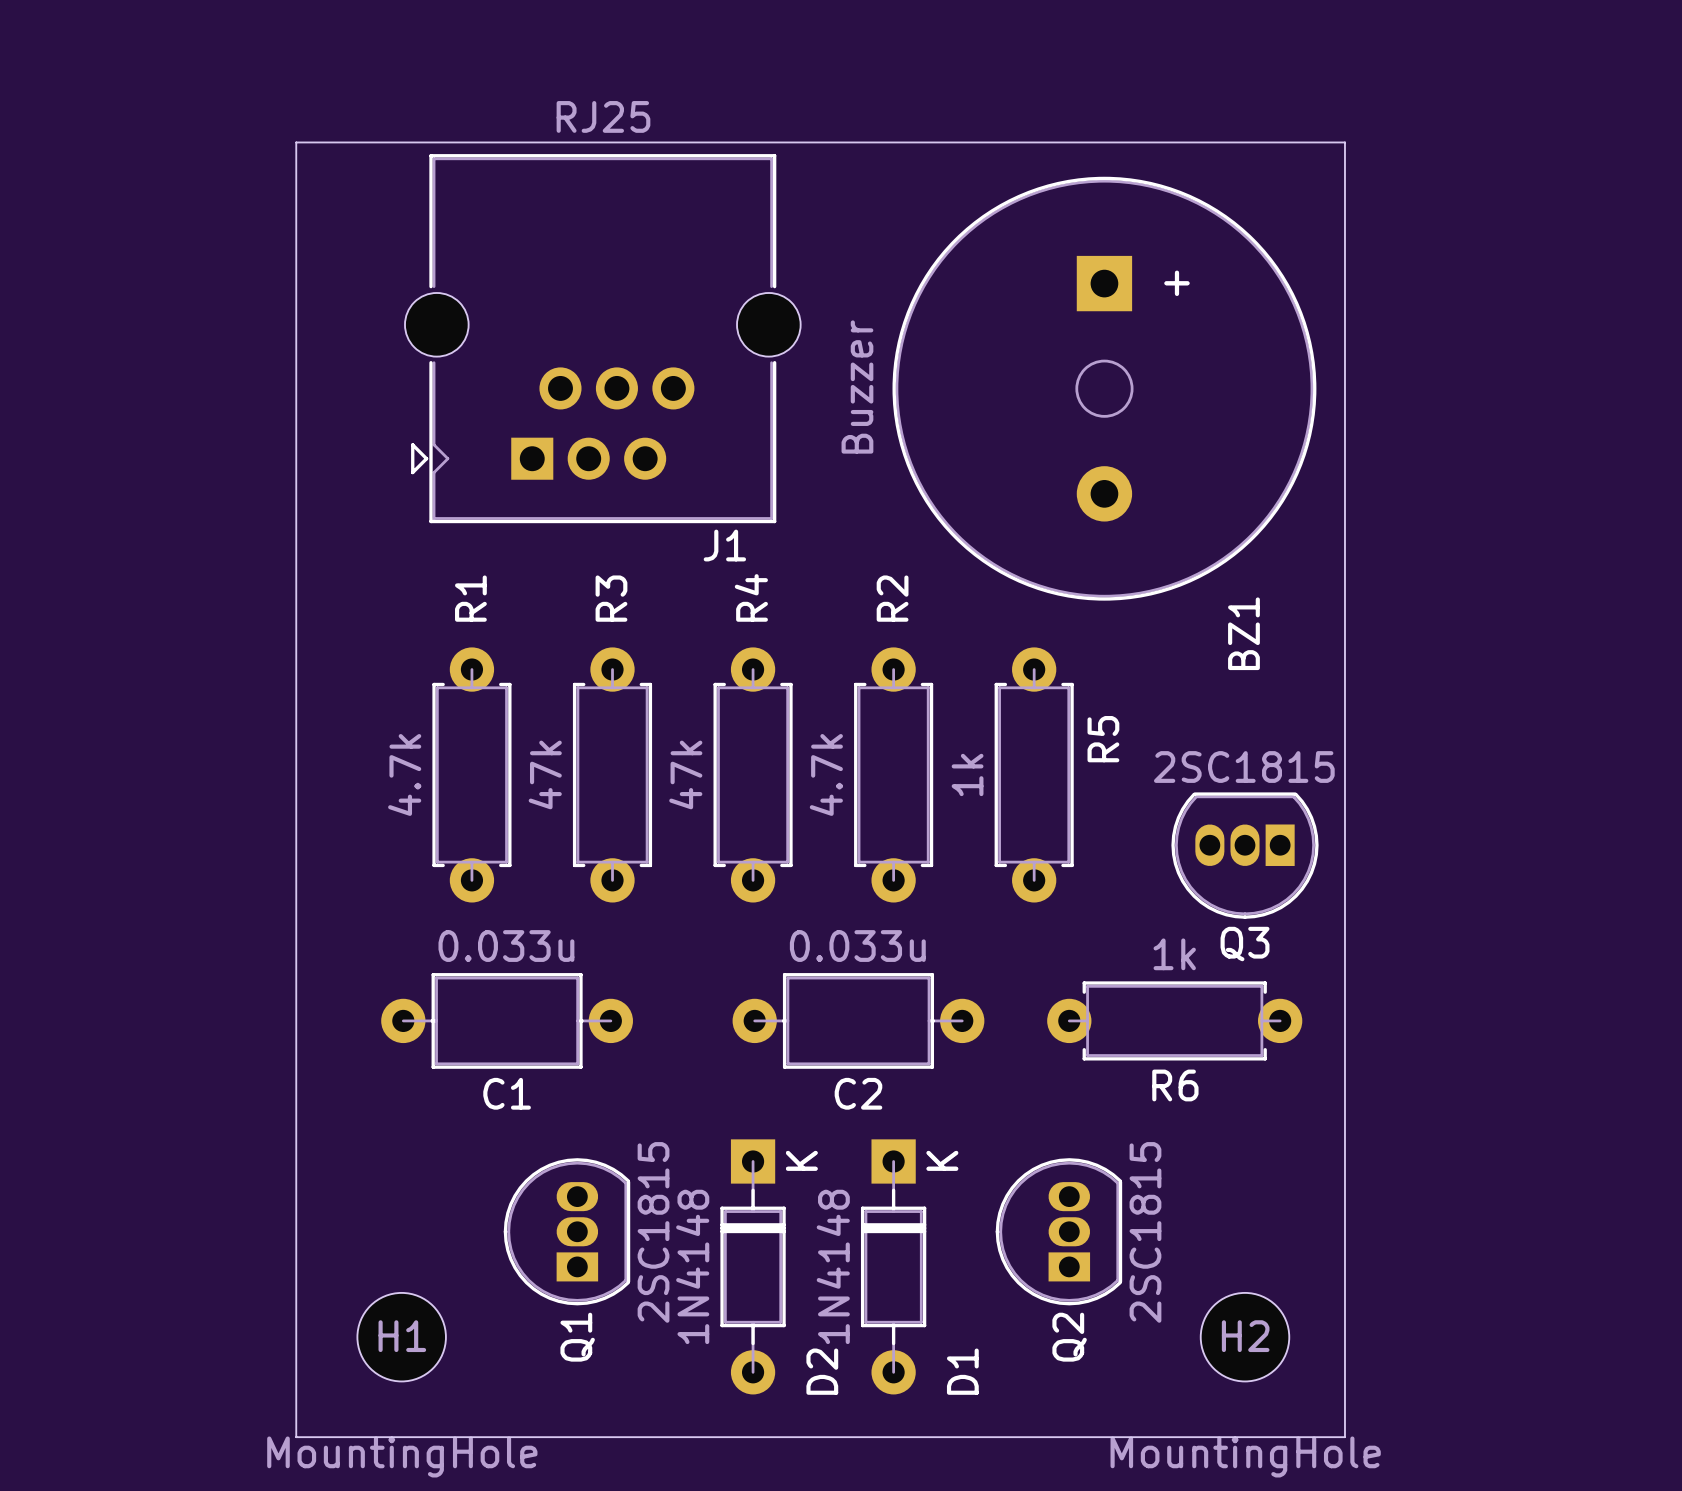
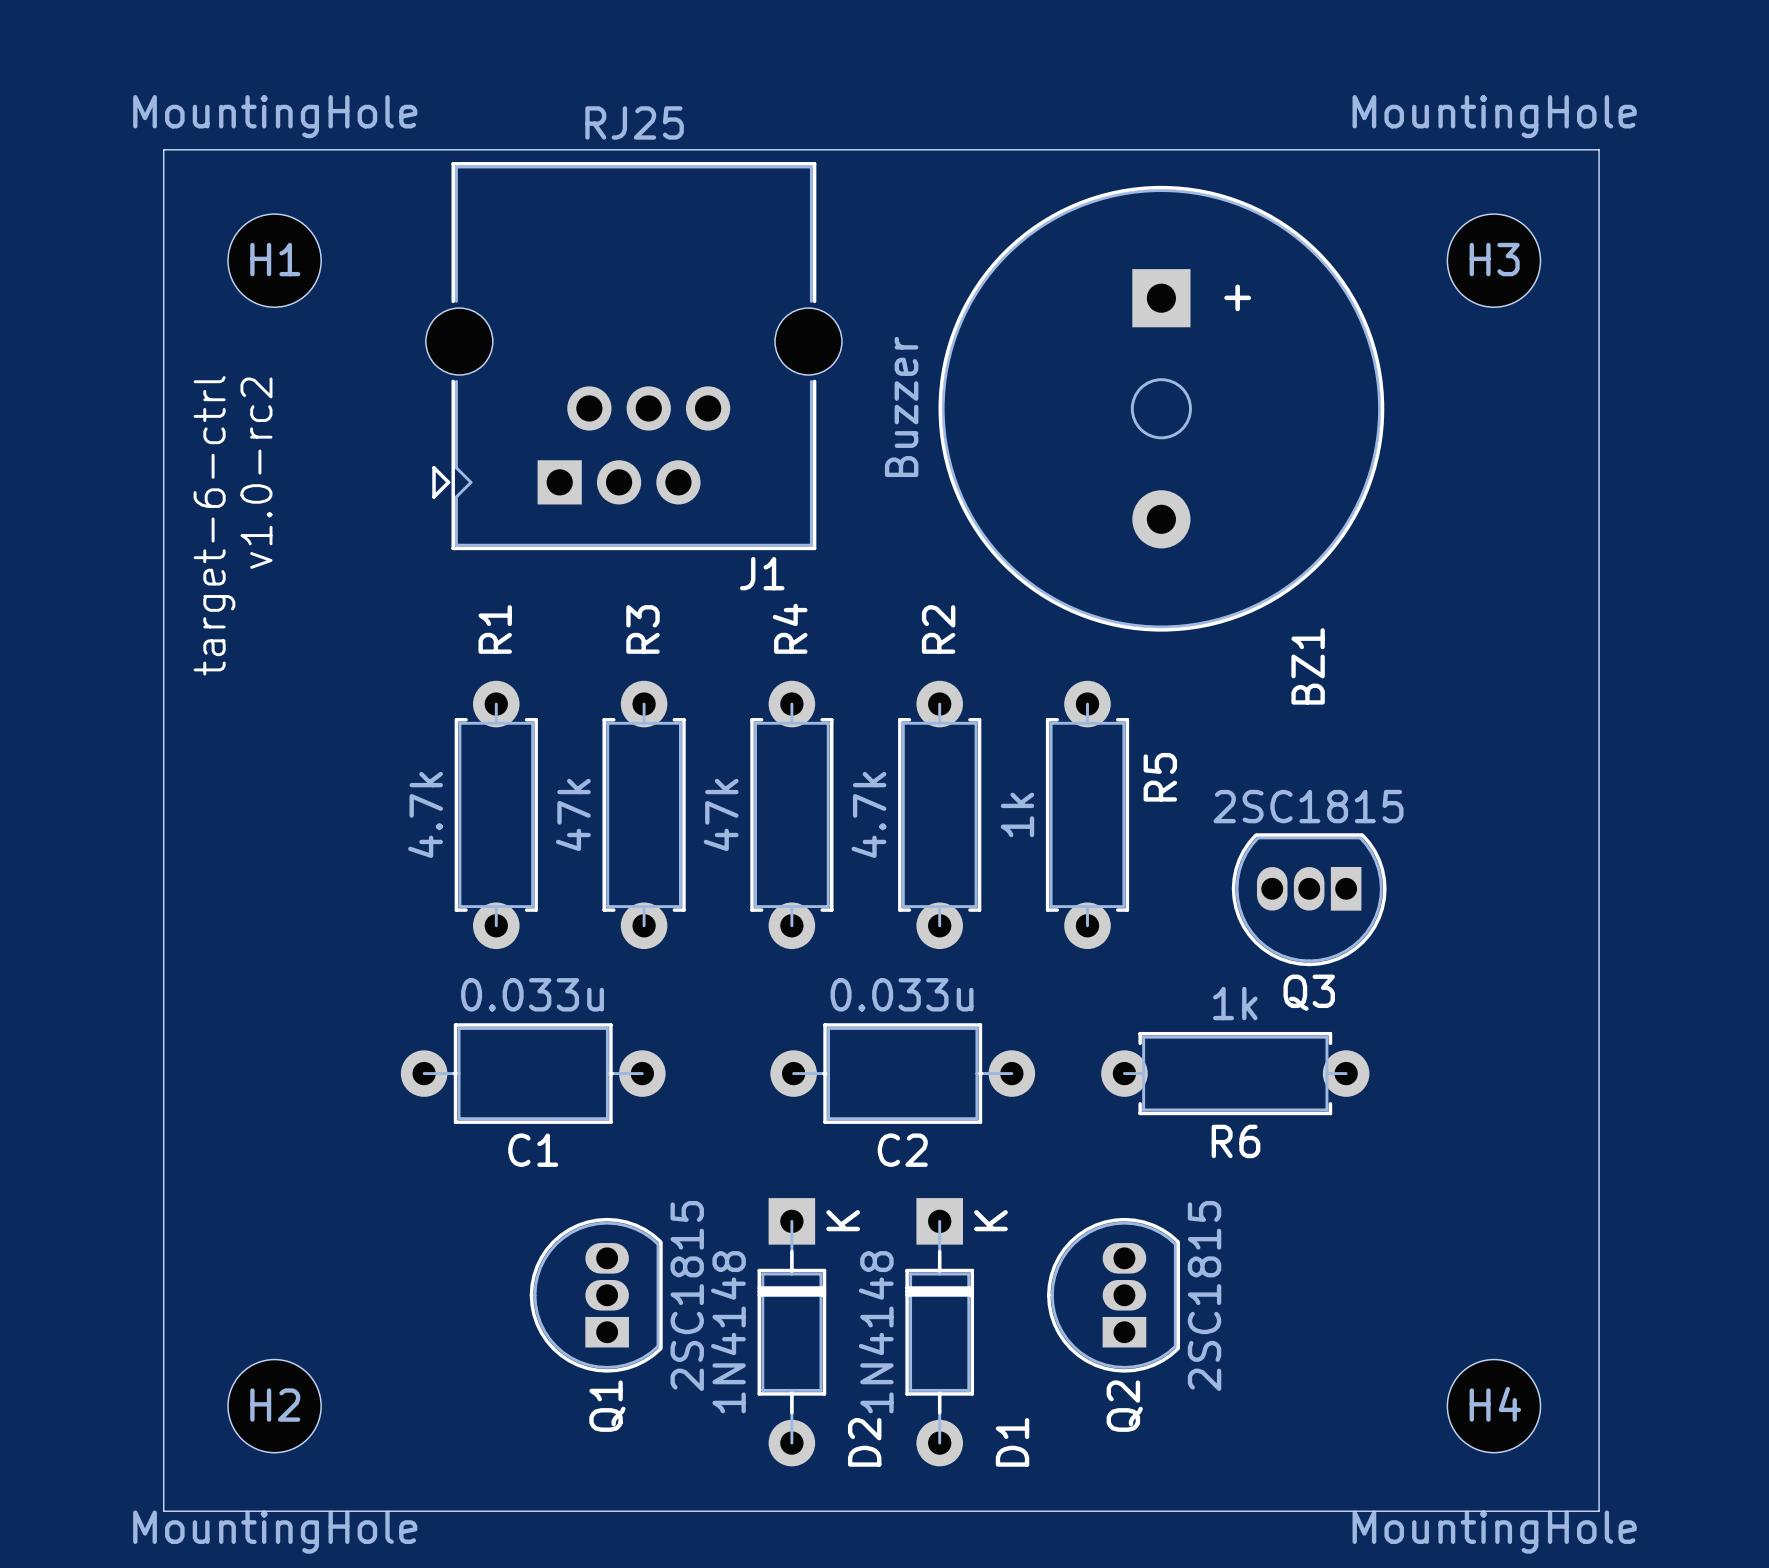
board edge: (296, 142) (296, 1437) -> (311, 149) (163, 149) (163, 1511) (311, 1511)
board edge: (1344, 142) (1344, 1437) -> (1414, 149) (1599, 149) (1599, 1511) (1414, 1511)
H3: none -> MountingHole (1493, 260)
text: none -> v1.0-rc2 (256, 473)
text: none -> target-6-ctrl (214, 525)
H1 position: (401, 1337) -> (274, 260)
H2 position: (1245, 1337) -> (274, 1406)
H4: none -> MountingHole (1493, 1406)
H1 value position: MountingHole (402, 1456) -> MountingHole (275, 116)

